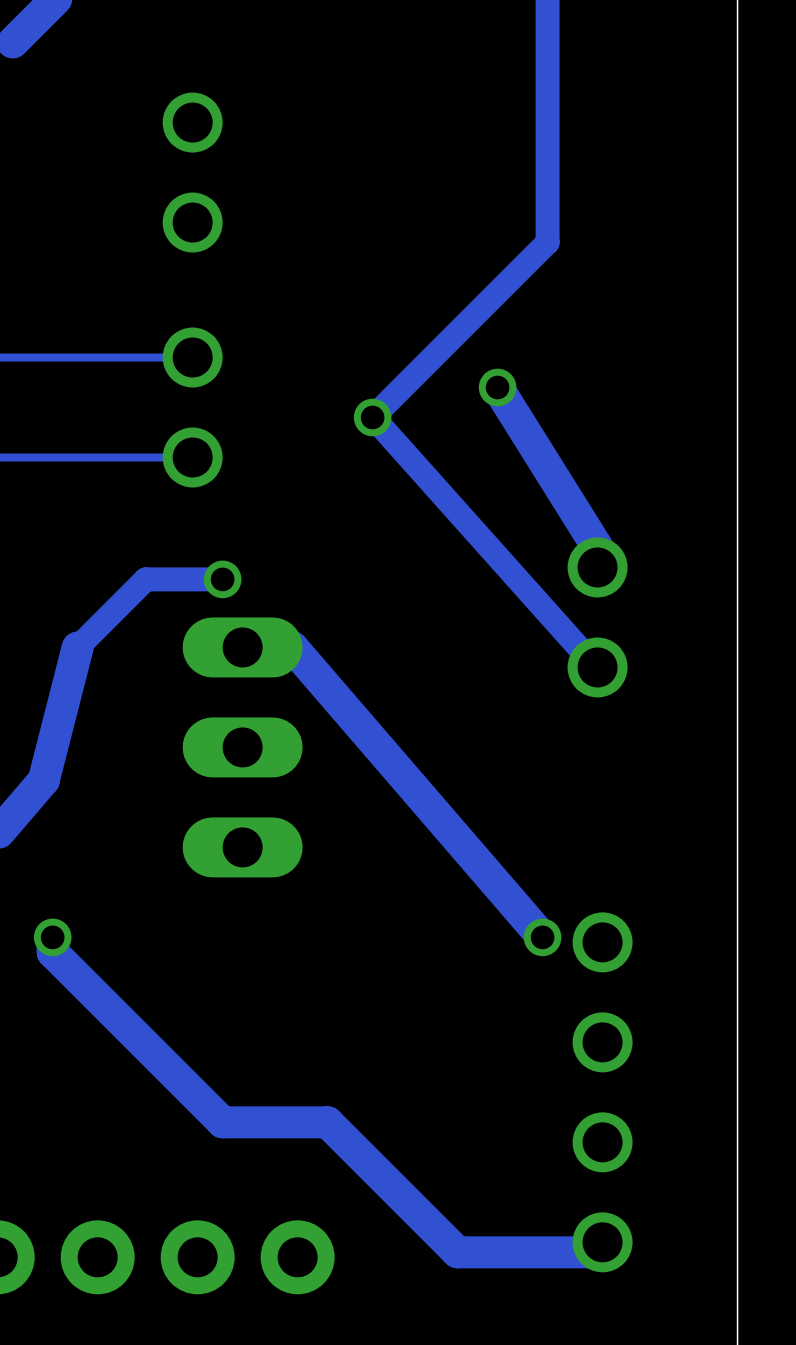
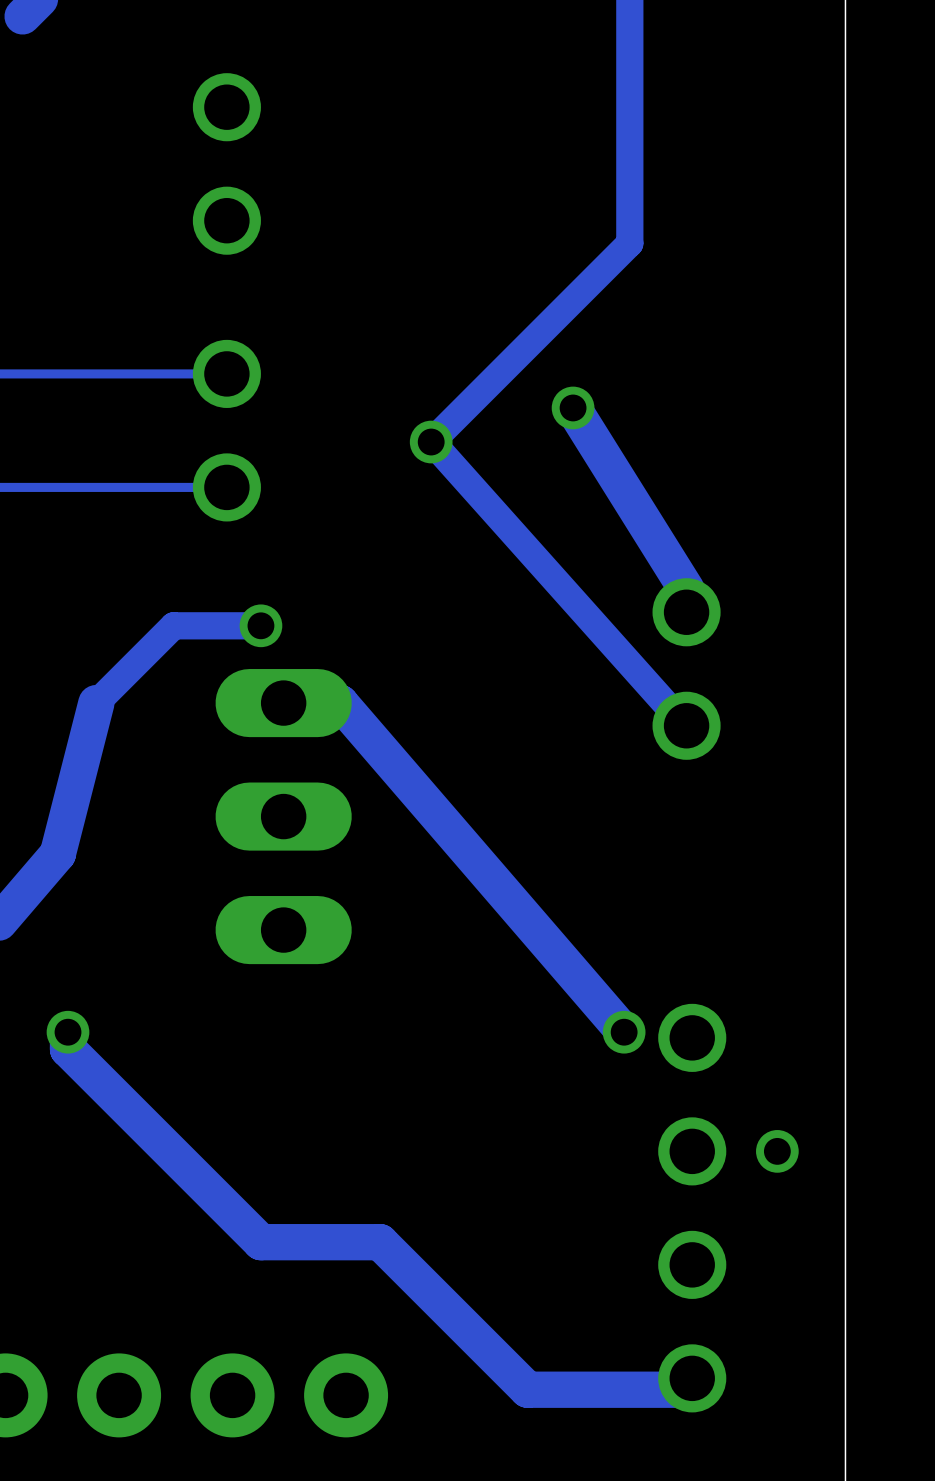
via: none -> (777, 1151)

